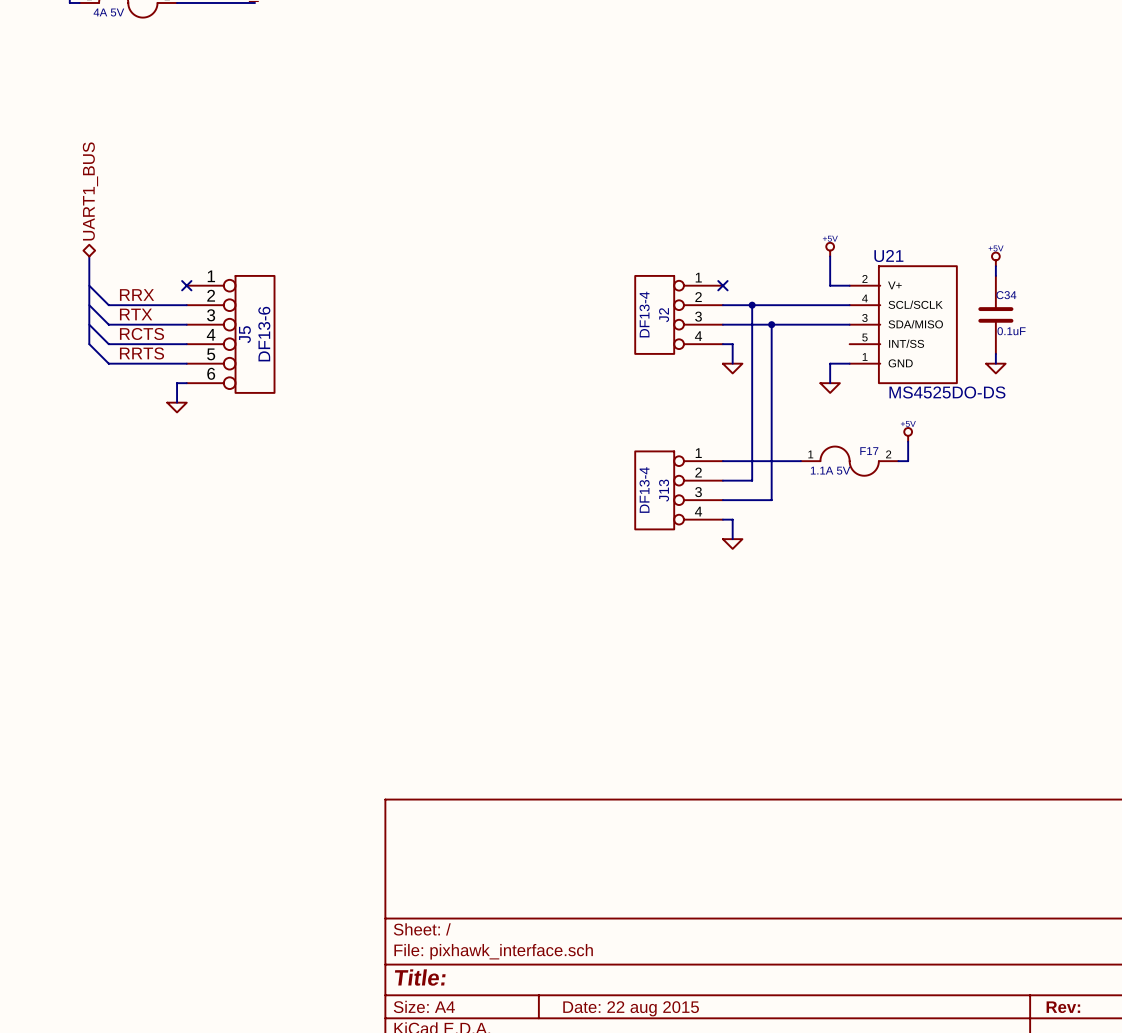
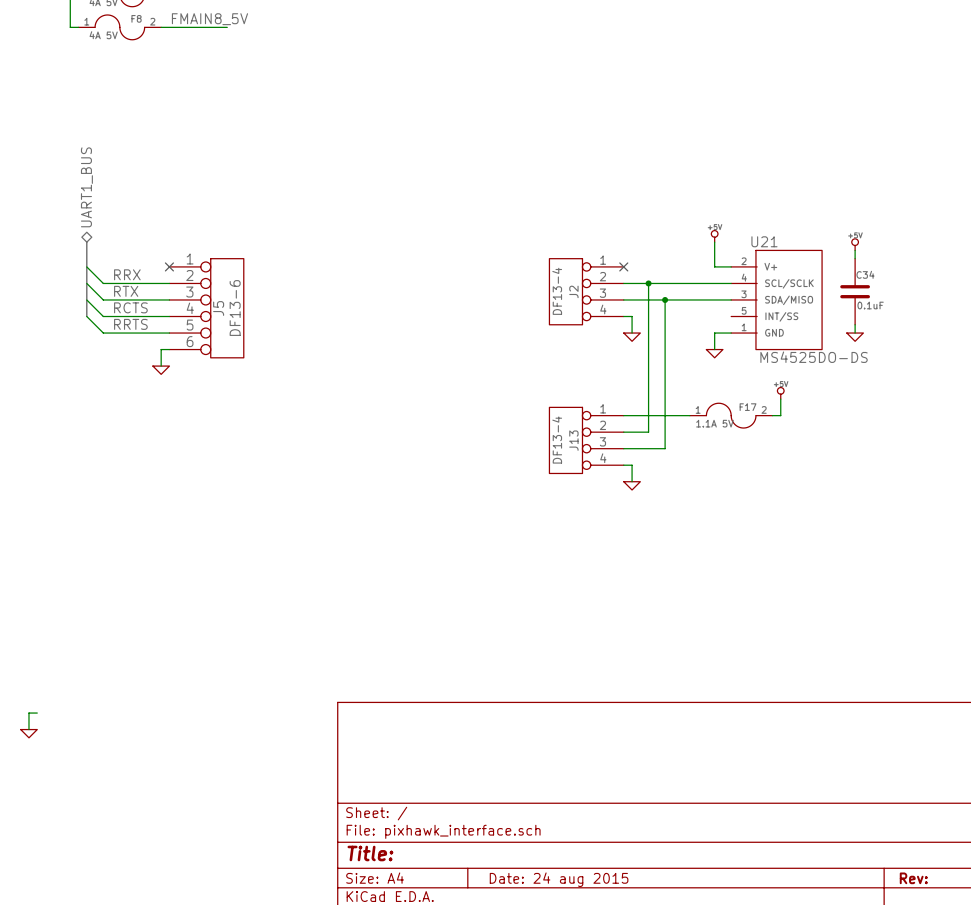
wire: none -> (37, 713) (28, 713) (28, 729)
power symbol: none -> (28, 733)
title block: Date: 22 aug 2015 (631, 1008) -> Date: 24 aug 2015 (559, 879)

